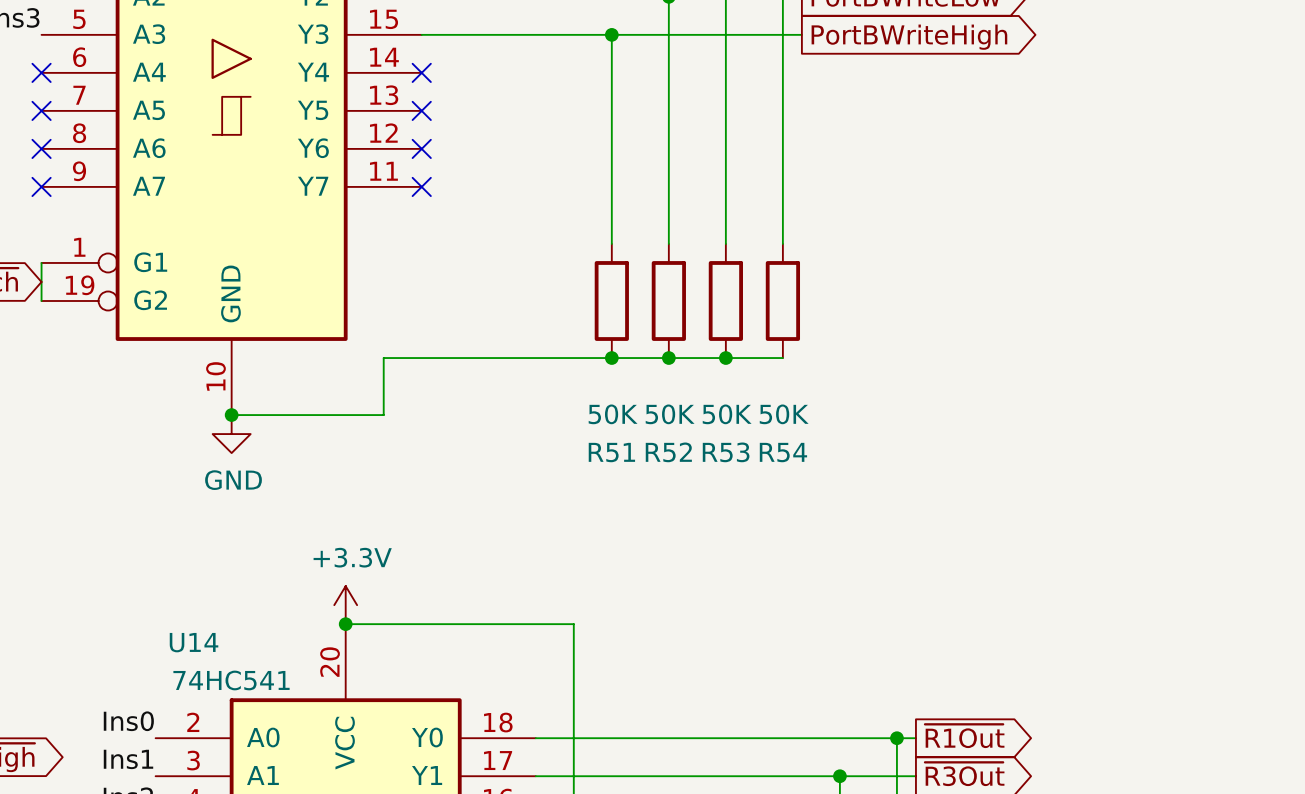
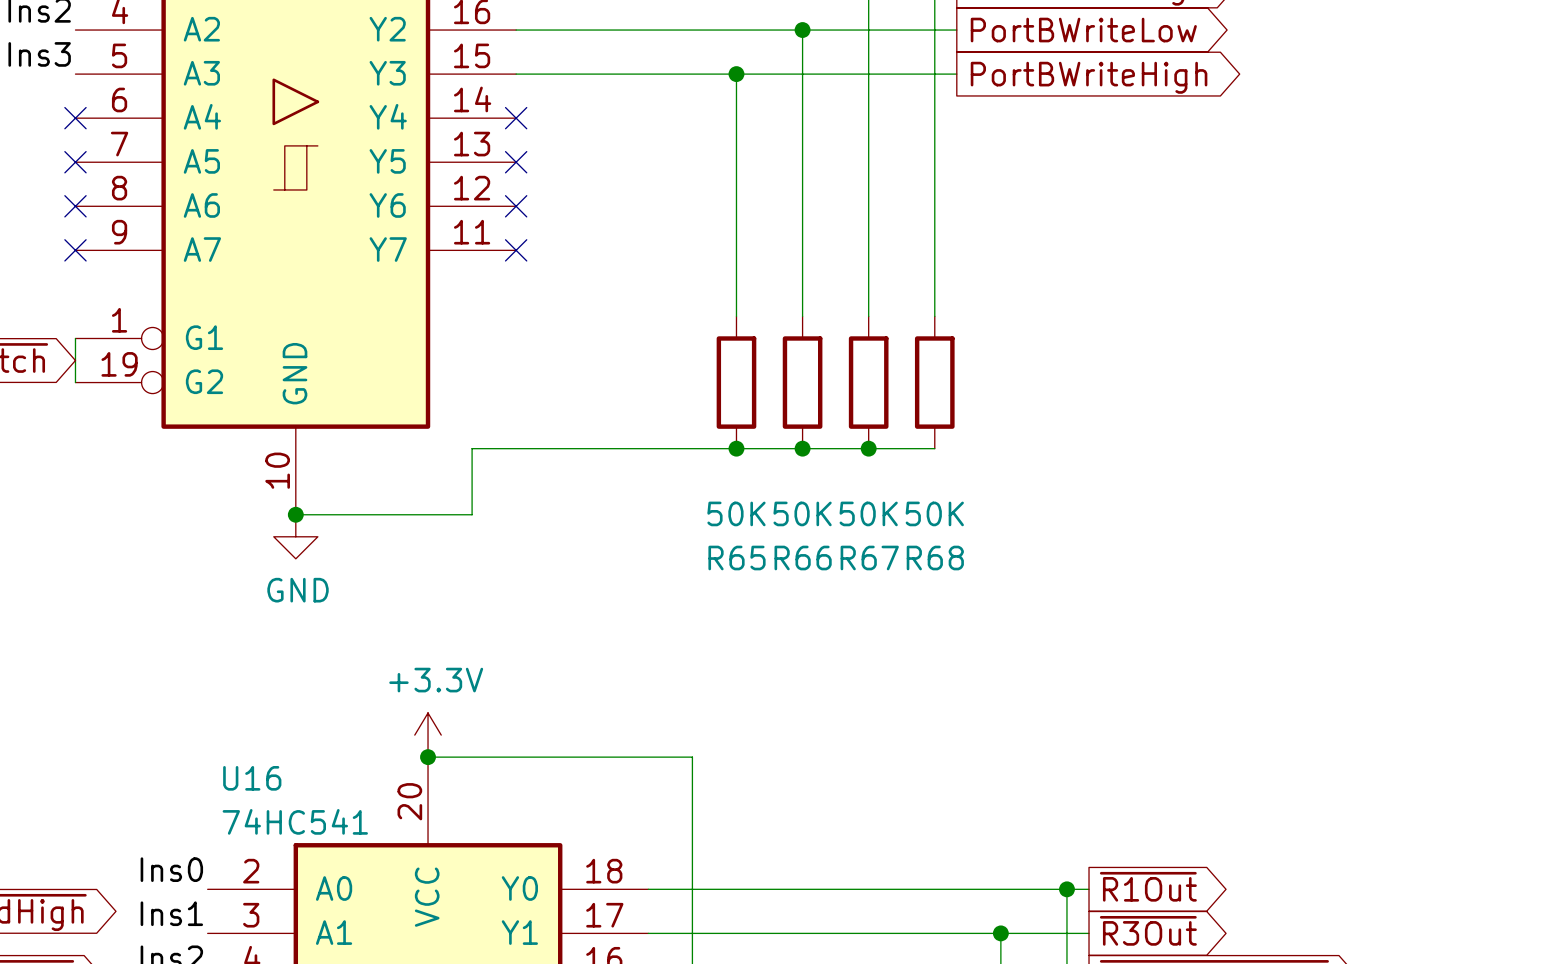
R51 name: R51 (611, 452) -> R65 (737, 558)
R52 name: R52 (668, 452) -> R66 (803, 558)
R53 name: R53 (726, 452) -> R67 (869, 558)
R54 name: R54 (783, 452) -> R68 (935, 558)
U14 name: U14 (194, 642) -> U16 (252, 778)

